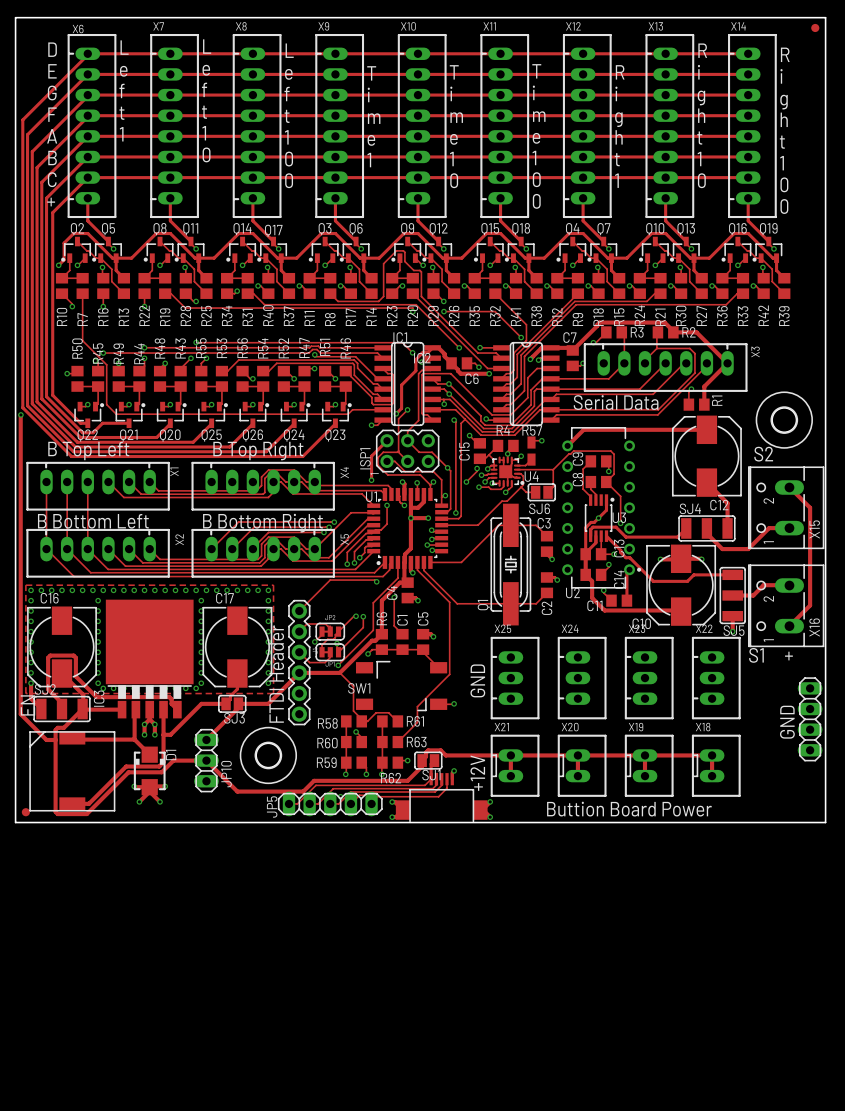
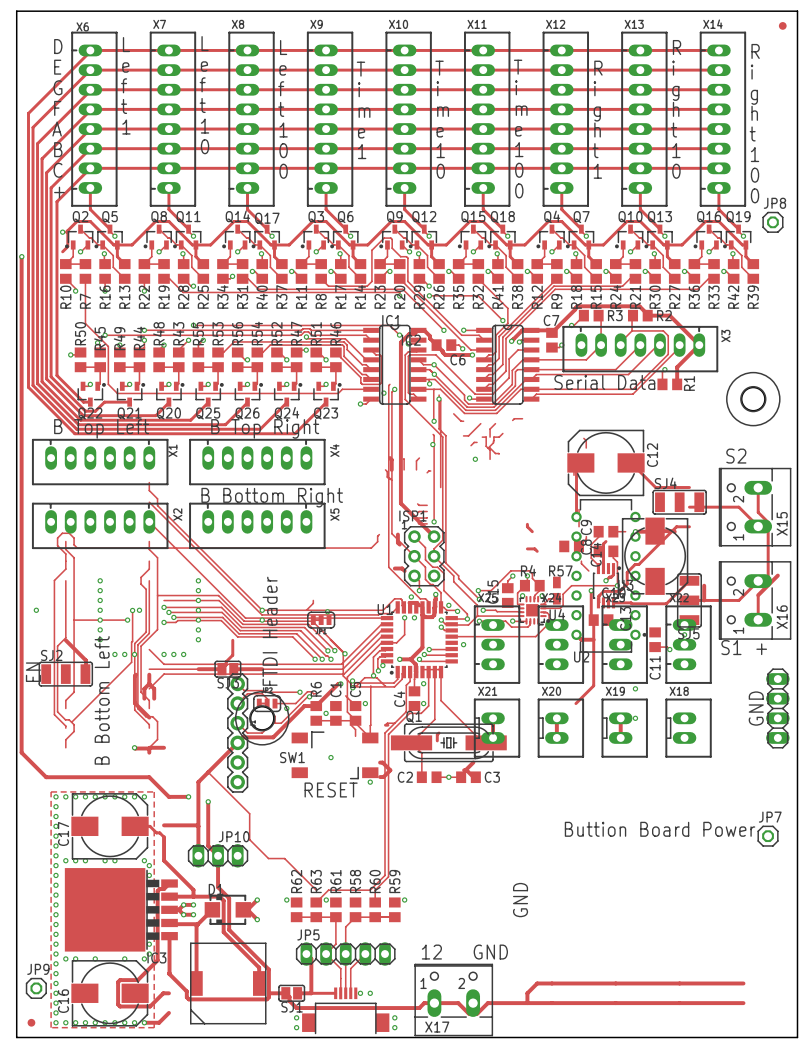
board edge: (15, 17) (15, 822) (825, 822) (825, 17) (15, 17) -> (16, 11) (16, 1037) (797, 1037) (797, 11) (16, 11)
JP8: none -> (772, 222)
via position: (58, 265) -> (62, 232)
track: none -> (21, 256) (21, 752) (46, 777) (149, 777) (168, 796) (188, 796)
via: none -> (21, 256)
track: (428, 351) (421, 354) -> (414, 334) (409, 334) (400, 342) (400, 503) (434, 536)
track: (421, 354) (415, 359) (415, 370) (401, 385) (401, 408) (396, 413) -> none
track: none -> (389, 384) (388, 567) (420, 598) (425, 598) (428, 601) (428, 607)
track: none -> (434, 389) (434, 421)
track: (404, 412) (398, 418) (398, 452) (407, 461) -> (391, 392) (391, 533) (425, 567) (425, 579) (441, 592) (441, 607) (446, 610) (457, 611)
track: (20, 414) (20, 714) (46, 739) (55, 739) -> none
via: (20, 414) -> none
track: none -> (439, 395) (439, 428) (445, 435) (445, 563) (479, 599)
track: (465, 419) (461, 423) (461, 516) (458, 518) (441, 518) -> none
track: (418, 420) (407, 431) (407, 440) (419, 452) (432, 452) (450, 470) (450, 508) (447, 512) (441, 512) -> (405, 399) (442, 437) (442, 540) (434, 548) (434, 556) (453, 575) (453, 581) (477, 605) (477, 616)
track: (706, 429) (583, 429) (567, 445) -> none
via: (469, 435) -> none
track: (387, 440) (371, 456) (371, 480) -> none
via: (541, 440) -> none
via: none -> (434, 421)
R4 position: (505, 445) -> (532, 585)
track: (398, 451) (383, 452) (377, 457) (377, 465) (387, 474) (420, 474) (430, 485) -> none
ISP1 rotation: 0° (407, 451) -> 90° clockwise (424, 556)
ISP1 position: (407, 451) -> (424, 556)
C15 position: (479, 451) -> (507, 595)
R57 position: (531, 451) -> (556, 590)
via: (507, 453) -> none
track: (488, 454) (494, 460) (494, 469) -> none
text position: S2 (763, 454) -> S2 (736, 456)
via: (521, 456) -> none
C12 rotation: 0° (706, 456) -> 90° counterclockwise (605, 462)
C12 position: (706, 456) -> (605, 462)
track: none -> (433, 434) (434, 521)
track: (531, 459) (525, 465) (517, 465) -> none
track: (387, 461) (394, 461) (405, 471) (433, 471) (441, 479) (441, 505) -> none
track: (590, 461) (583, 469) (583, 489) (590, 496) (590, 500) -> none
C9 position: (598, 461) -> (605, 531)
track: (477, 468) (477, 471) (466, 482) -> none
via: (477, 468) -> none
via: (487, 468) -> none
track: (517, 469) (553, 469) -> none
track: (553, 469) (573, 451) (610, 451) (614, 454) (614, 474) (606, 482) (620, 496) (620, 523) -> none
track: (553, 469) (553, 487) (548, 492) -> none
U4 position: (507, 471) -> (534, 610)
via: (608, 471) -> none
track: (494, 473) (481, 475) -> none
track: (517, 473) (523, 476) (523, 485) (507, 501) (502, 501) (478, 525) (441, 525) -> none
via: (481, 475) -> none
track: (494, 477) (489, 477) (485, 481) -> none
via: (371, 480) -> none
via: (485, 481) -> none
track: (46, 482) (46, 549) (70, 573) -> (65, 728) (54, 714) (54, 580) (65, 569) (65, 553) (57, 545) (57, 538) (62, 533) (69, 533) (74, 538) (74, 544)
track: (67, 482) (67, 549) (90, 572) (374, 572) (384, 562) -> none
track: (87, 482) (87, 549) (108, 569) (355, 569) (373, 551) -> none
track: (108, 482) (123, 497) (268, 497) (273, 492) (273, 482) (281, 482) (293, 493) (361, 493) (373, 505) -> none
track: (129, 482) (141, 494) (263, 494) (264, 478) (269, 473) (277, 473) (285, 482) (301, 482) (310, 490) (381, 490) (384, 494) -> none
track: (149, 482) (158, 490) (256, 490) (261, 485) (261, 477) (268, 470) (294, 470) (306, 482) (314, 482) (318, 485) (388, 485) (391, 488) (391, 494) -> none
via: (402, 482) -> none
via: (417, 482) -> none
via: (433, 482) -> none
via: (466, 482) -> none
C8 position: (598, 482) -> (605, 551)
track: (706, 482) (727, 503) (727, 528) -> none
track: (492, 483) (499, 483) -> none
track: (503, 483) (501, 489) (479, 487) -> none
track: (511, 483) (511, 486) (505, 492) -> none
via: (479, 487) -> none
track: (521, 487) (526, 492) (535, 492) -> none
track: none -> (580, 462) (576, 467) (576, 516)
track: none -> (631, 462) (655, 487) (689, 487)
track: (789, 487) (810, 507) (810, 605) -> none
via: (505, 492) -> none
SJ6: (541, 492) -> none
track: (410, 494) (410, 548) (404, 554) (404, 562) (404, 579) (407, 582) (399, 582) (381, 600) (381, 634) (375, 640) (372, 640) (339, 672) (299, 672) (268, 703) -> (387, 630) (381, 630) (342, 669) (262, 669)
track: (423, 494) (423, 501) (418, 507) (410, 507) -> none
via: (445, 495) -> none
track: (606, 500) (606, 510) (585, 527) (585, 574) (592, 581) (592, 597) (604, 610) (681, 611) -> none
track: (387, 505) (387, 524) (381, 529) (366, 533) (347, 552) (347, 564) -> none
via: (387, 505) -> none
via: (404, 505) -> none
track: none -> (149, 482) (149, 490) (157, 498) (157, 505) (262, 610) (383, 610) (394, 598) (400, 598) (403, 607)
U2 position: (601, 507) -> (608, 575)
X15 position: (786, 507) -> (755, 507)
track: (373, 512) (351, 512) (314, 549) (306, 549) (294, 537) (268, 537) (261, 544) (261, 555) (258, 559) (160, 559) -> (387, 618) (245, 618) (159, 531)
via: (455, 512) -> none
track: none -> (758, 487) (758, 512) (768, 522) (768, 585)
track: (373, 518) (367, 518) (328, 557) (310, 557) (301, 549) (285, 549) (277, 540) (269, 540) (264, 545) (264, 557) (259, 562) (142, 562) (129, 549) -> none
track: (410, 518) (428, 518) -> none
via: (410, 518) -> none
via: (428, 518) -> none
via: (598, 518) -> none
U3 position: (599, 518) -> (607, 585)
text rotation: 0° (93, 521) -> 90° counterclockwise (102, 700)
text position: B Bottom Left (93, 521) -> B Bottom Left (102, 700)
track: (331, 522) (238, 522) (211, 549) -> none
via: (334, 522) -> none
via: (620, 523) -> none
track: (373, 525) (367, 525) (332, 561) (293, 561) (281, 549) (273, 549) (268, 554) (268, 559) (261, 566) (125, 566) (108, 549) -> none
track: (326, 527) (254, 527) (232, 549) -> none
via: (329, 527) -> none
track: none -> (149, 502) (262, 614) (378, 614) (391, 613) (397, 607)
U1 position: (407, 528) -> (419, 639)
track: (686, 528) (677, 537) (625, 537) (616, 527) (592, 527) (590, 529) (590, 536) -> none
track: (789, 528) (769, 528) (748, 549) (722, 549) (706, 533) (706, 528) -> none
via: (431, 530) -> none
track: (323, 532) (268, 532) (252, 549) -> none
via: (323, 532) -> none
track: none -> (689, 507) (738, 507) (758, 526)
track: (546, 536) (536, 525) (498, 525) (461, 562) (430, 562) -> none
track: (595, 536) (595, 542) (585, 553) -> none
track: (606, 536) (625, 557) (629, 557) (653, 581) (687, 581) (693, 574) (732, 574) -> none
track: (373, 538) (366, 539) (354, 551) (354, 562) -> none
via: (431, 539) -> none
C3 rotation: 0° (546, 543) -> 90° clockwise (468, 777)
C3 position: (546, 543) -> (468, 777)
track: (373, 544) (366, 546) (364, 552) (359, 557) -> none
via: (427, 545) -> none
via: none -> (434, 521)
via: (432, 550) -> none
C13 position: (593, 554) -> (601, 620)
track: (601, 554) (614, 554) -> (613, 531) (625, 531)
via: (614, 554) -> none
track: none -> (689, 526) (676, 526) (638, 564) (635, 564) (627, 572) (627, 583) (619, 591) (603, 591) (598, 596) (598, 602)
via: (359, 557) -> none
via: (552, 559) -> none
track: none -> (598, 531) (598, 537) (591, 544) (591, 558) (598, 565) (598, 568)
via: (701, 559) -> none
via: (354, 562) -> none
track: (397, 562) (397, 578) (373, 602) (373, 630) (338, 665) -> none
track: (417, 562) (417, 570) (449, 602) (449, 674) (417, 706) (417, 722) (397, 742) -> none
track: (423, 562) (423, 570) (457, 603) (536, 603) (546, 592) -> none
via: (347, 564) -> none
track: none -> (414, 536) (425, 547) (425, 559) (432, 567) (437, 567) (443, 573) (443, 590) (467, 614) (467, 619) (451, 618)
Q1 rotation: 0° (510, 564) -> 90° clockwise (448, 742)
Q1 position: (510, 564) -> (448, 742)
via: (608, 564) -> none
track: none -> (65, 541) (65, 549) (74, 557) (74, 692) (65, 700) (65, 708)
track: none -> (149, 541) (149, 549) (157, 557) (157, 629) (141, 646) (141, 692) (149, 700) (149, 708)
via: (412, 572) -> none
via: (557, 580) -> none
track: none -> (613, 551) (613, 557) (617, 562) (617, 585) (571, 585) (563, 594) (563, 605) (560, 608) (543, 608)
track: (376, 581) (374, 580) (330, 580) (299, 610) -> none
via: (376, 581) -> none
zone outline: (25, 585) (273, 585) (273, 693) (25, 693) (25, 585) -> none
C2 rotation: 0° (546, 585) -> 90° clockwise (429, 777)
C2 position: (546, 585) -> (429, 777)
track: (789, 585) (763, 585) (753, 595) (732, 595) -> none
via: (31, 590) -> none
via: (41, 590) -> none
via: (51, 590) -> none
via: (62, 590) -> none
via: (72, 590) -> none
via: (82, 590) -> none
via: (92, 590) -> none
via: (103, 590) -> none
via: (113, 590) -> none
via: (123, 590) -> none
via: (134, 590) -> none
via: (144, 590) -> none
track: none -> (149, 561) (149, 569) (141, 577)
via: (154, 590) -> none
via: (165, 590) -> none
via: (175, 590) -> none
via: (185, 590) -> none
via: (196, 590) -> none
via: (206, 590) -> none
via: (216, 590) -> none
via: (227, 590) -> none
via: (237, 590) -> none
via: (247, 590) -> none
via: (258, 590) -> none
via: (268, 590) -> none
C4 position: (407, 590) -> (414, 698)
via: (603, 590) -> none
SJ5 position: (732, 595) -> (689, 600)
track: (394, 597) (394, 625) (402, 634) -> none
via: (394, 597) -> none
track: none -> (613, 568) (613, 574) (605, 580)
via: (31, 600) -> none
via: (98, 600) -> none
via: (201, 600) -> none
via: (268, 600) -> none
via: (418, 600) -> none
C11 rotation: 0° (619, 600) -> 90° clockwise (655, 639)
C11 position: (619, 600) -> (655, 639)
track: none -> (414, 575) (419, 580) (419, 590)
track: none -> (527, 575) (527, 583) (517, 593) (517, 604)
via: none -> (527, 575)
C11 name position: C11 (594, 605) -> C11 (655, 667)
X16 position: (786, 605) -> (755, 600)
track: none -> (512, 576) (507, 581) (507, 588)
via: none -> (512, 576)
track: none -> (141, 577) (141, 584) (146, 589) (146, 632) (134, 643) (134, 710) (149, 724) (149, 728)
via: (31, 610) -> none
track: none -> (65, 580) (65, 637) (57, 646) (57, 711) (74, 724) (74, 731) (65, 739) (65, 747)
track: none -> (149, 580) (149, 633) (137, 644) (137, 708) (145, 716) (152, 716) (157, 721) (157, 739) (149, 747)
via: (268, 610) -> none
via: none -> (605, 580)
track: none -> (689, 580) (666, 603) (613, 602)
track: none -> (758, 581) (738, 600) (689, 600)
track: (356, 616) (335, 634) (333, 639) (327, 639) (322, 645) (322, 652) -> none
via: (356, 616) -> none
track: (363, 616) (363, 627) (338, 652) (337, 643) -> none
via: (363, 616) -> none
via: none -> (617, 585)
via: (31, 621) -> none
via: (268, 621) -> none
via: none -> (419, 590)
track: none -> (478, 590) (491, 590) (510, 570) (529, 570) (532, 573) (532, 578) (539, 585) (539, 590) (534, 595) (534, 599)
via: none -> (478, 590)
track: none -> (591, 590) (591, 617) (593, 620) (593, 685) (575, 703)
via: none -> (591, 590)
track: none -> (435, 594) (434, 615) (432, 617) (422, 615)
via: none -> (435, 594)
track: none -> (157, 595) (218, 595) (244, 621) (312, 621) (345, 653)
via: none -> (522, 595)
via: none -> (542, 595)
track: none -> (758, 595) (758, 619)
via: none -> (411, 596)
track: none -> (556, 598) (549, 598) (543, 604)
via: none -> (479, 599)
via: (31, 631) -> none
track: none -> (164, 600) (219, 600) (242, 624) (308, 624) (334, 650)
via: (268, 631) -> none
track: (299, 631) (306, 624) (325, 624) (330, 626) (330, 631) -> none
part position: (330, 631) -> (267, 703)
via: (732, 631) -> none
via: (433, 636) -> none
via: none -> (448, 605)
track: none -> (164, 607) (221, 607) (241, 627) (304, 627) (327, 650)
via: none -> (164, 607)
track: none -> (422, 607) (422, 647) (410, 659)
via: none -> (139, 610)
via: (314, 641) -> none
R6 position: (381, 641) -> (316, 713)
C1 position: (402, 641) -> (335, 713)
C5 position: (423, 641) -> (355, 713)
track: none -> (483, 610) (521, 612)
via: none -> (483, 610)
track: none -> (132, 610) (131, 662) (71, 722)
via: none -> (132, 610)
via: none -> (457, 611)
track: none -> (543, 612) (549, 614) (549, 623) (535, 636) (451, 636)
track: none -> (168, 612) (222, 612) (240, 630) (300, 630) (330, 659)
via: none -> (168, 612)
C16 rotation: 0° (62, 647) -> 90° counterclockwise (110, 993)
C16 position: (62, 647) -> (110, 993)
C17 rotation: 0° (237, 647) -> 90° counterclockwise (110, 826)
C17 position: (237, 647) -> (110, 826)
track: none -> (477, 616) (468, 625) (445, 624) (441, 620)
track: none -> (477, 616) (521, 616)
track: none -> (173, 617) (222, 617) (238, 633) (296, 633) (322, 659)
via: none -> (173, 617)
track: none -> (404, 617) (404, 634) (396, 642) (381, 642) (347, 677) (347, 712) (370, 737)
via: none -> (404, 617)
via: none -> (414, 617)
via: none -> (467, 619)
via: (31, 652) -> none
track: none -> (74, 620) (127, 620)
via: none -> (127, 620)
track: (299, 652) (309, 662) (325, 662) (330, 657) (330, 652) -> (237, 723) (247, 733) (262, 733) (267, 728) (267, 723)
via: none -> (441, 620)
track: (368, 653) (372, 649) (423, 649) (423, 652) (438, 667) -> none
via: (368, 653) -> none
track: none -> (479, 621) (505, 621) (511, 627) (527, 627) (530, 621)
via: none -> (479, 621)
track: none -> (512, 621) (526, 621)
via: none -> (512, 621)
track: none -> (164, 622) (221, 620) (237, 636) (292, 636) (315, 659)
via: none -> (164, 622)
text position: S1 (756, 655) -> S1 (731, 647)
track: none -> (387, 624) (381, 624) (341, 664) (164, 664) (149, 649)
text position: + (788, 656) -> + (761, 649)
IC3 rotation: 0° (149, 659) -> 90° counterclockwise (121, 909)
IC3 position: (149, 659) -> (121, 909)
track: none -> (441, 627) (444, 630) (451, 630)
via: none -> (441, 627)
SW1 footprint: [355, 661, 448, 711] -> [291, 731, 379, 780]
via: (31, 662) -> none
via: (268, 662) -> none
part position: (299, 662) -> (237, 733)
via: (338, 665) -> none
track: none -> (576, 634) (581, 639) (593, 639)
via: none -> (684, 634)
track: none -> (387, 636) (381, 636) (344, 674) (164, 674) (149, 688)
via: (31, 672) -> none
via: (268, 672) -> none
via: none -> (463, 644)
text: GND (477, 680) -> none
track: none -> (655, 647) (667, 647) (669, 649)
track: none -> (387, 649) (379, 650) (373, 657) (373, 675)
track: none -> (451, 649) (429, 649)
track: (31, 683) (31, 698) (41, 709) -> none
via: (31, 683) -> none
via: (98, 683) -> none
via: (201, 683) -> none
via: (268, 683) -> none
via: none -> (429, 649)
via: none -> (669, 649)
via: none -> (327, 650)
via: none -> (334, 650)
via: none -> (345, 653)
via: (103, 688) -> none
via: (196, 688) -> none
track: none -> (424, 654) (451, 655)
via: none -> (424, 654)
track: none -> (387, 655) (377, 658) (378, 670)
via: none -> (315, 659)
via: none -> (322, 659)
via: none -> (330, 659)
track: none -> (399, 659) (410, 659)
via: none -> (399, 659)
track: none -> (410, 659) (415, 664) (414, 679)
track: none -> (419, 659) (421, 661) (451, 661)
via: none -> (419, 659)
via: none -> (382, 665)
track: (201, 703) (170, 734) (163, 734) -> (198, 669) (149, 669)
track: (238, 703) (238, 707) (206, 739) -> none
via: (454, 703) -> none
via: none -> (378, 670)
track: none -> (397, 672) (397, 679) (393, 683) (355, 683) (352, 680)
track: none -> (403, 672) (402, 679) (394, 686) (352, 687)
track: none -> (410, 672) (410, 681) (406, 685) (406, 711) (385, 733) (385, 875) (370, 890) (328, 890) (316, 902)
track: none -> (428, 672) (428, 705) (421, 713) (409, 713) (388, 734) (388, 876) (375, 890) (375, 902)
track: none -> (434, 672) (434, 719) (411, 742) (421, 753) (421, 777)
track: none -> (441, 672) (441, 700) (484, 744)
track: (62, 709) (62, 703) (48, 689) (48, 657) (50, 655) (73, 655) (75, 657) (75, 676) (96, 697) (169, 697) (171, 703) (177, 709) -> none
track: (82, 709) (122, 709) -> none
track: (82, 709) (63, 727) (57, 727) (55, 729) (55, 811) (57, 814) (86, 814) (128, 772) (161, 772) (173, 760) (206, 760) (237, 791) (303, 791) (314, 780) (407, 780) (422, 766) (422, 760) (428, 750) (440, 750) (445, 755) (712, 755) (712, 776) -> none
track: (163, 709) (163, 762) (159, 766) (126, 766) (88, 803) (72, 803) -> none
via: none -> (373, 675)
track: none -> (414, 679) (414, 691)
via: none -> (352, 680)
track: none -> (237, 683) (244, 690) (299, 692)
track: none -> (340, 683) (338, 683) (316, 706) (304, 706) (273, 737) (243, 737) (198, 782) (198, 855)
via: none -> (340, 683)
via: none -> (423, 683)
part position: (810, 719) -> (777, 708)
track: (346, 721) (345, 774) -> none
R58 rotation: 0° (354, 721) -> 90° clockwise (355, 909)
R58 position: (354, 721) -> (355, 909)
R61 rotation: 0° (390, 721) -> 90° clockwise (335, 909)
R61 position: (390, 721) -> (335, 909)
R61 name position: R61 (415, 721) -> R61 (335, 881)
text position: GND (787, 722) -> GND (756, 708)
via: none -> (352, 687)
via: (144, 724) -> none
via: (154, 724) -> none
via: none -> (635, 688)
via: none -> (299, 692)
track: none -> (316, 693) (307, 691) (295, 703) (275, 703)
via: (356, 731) -> none
track: none -> (309, 696) (281, 723) (275, 723) (275, 716) (272, 713) (262, 713) (259, 710) (259, 703)
via: none -> (309, 696)
via: (144, 734) -> none
via: (154, 734) -> none
track: (72, 738) (73, 739) (134, 739) -> none
track: none -> (237, 703) (247, 693) (262, 693) (267, 698) (267, 703)
via: none -> (365, 703)
via: none -> (423, 703)
R60 rotation: 0° (354, 742) -> 90° clockwise (375, 909)
R60 position: (354, 742) -> (375, 909)
R63 rotation: 0° (390, 742) -> 90° clockwise (316, 909)
R63 position: (390, 742) -> (316, 909)
R63 name position: R63 (416, 742) -> R63 (316, 881)
via: none -> (286, 708)
via: none -> (326, 713)
via: none -> (635, 718)
track: none -> (316, 720) (355, 720)
JP10 rotation: 0° (206, 760) -> 90° clockwise (218, 855)
JP10 position: (206, 760) -> (218, 855)
via: (407, 760) -> none
SJ1 position: (428, 760) -> (291, 993)
track: (434, 760) (431, 763) (431, 779) (424, 785) (315, 785) (297, 803) (289, 803) -> none
R59 rotation: 0° (354, 762) -> 90° clockwise (394, 909)
R59 position: (354, 762) -> (394, 909)
R62 rotation: 0° (390, 762) -> 90° clockwise (296, 909)
R62 position: (390, 762) -> (296, 909)
D1 rotation: 0° (149, 770) -> 90° counterclockwise (227, 909)
D1 position: (149, 770) -> (227, 909)
via: (454, 770) -> none
part: (72, 771) -> none
text: +12V (477, 773) -> none
JP10 name position: JP10 (226, 774) -> JP10 (234, 836)
via: (345, 774) -> none
via: (366, 774) -> none
via: (381, 774) -> none
R62 name position: R62 (391, 778) -> R62 (296, 881)
track: (436, 779) (436, 785) (432, 788) (333, 788) (318, 803) (309, 803) -> none
track: (441, 779) (441, 785) (435, 791) (350, 791) (343, 799) -> none
track: (447, 779) (447, 788) (438, 796) (359, 795) (350, 803) -> none
via: (165, 786) -> none
part: (441, 797) -> none
track: (343, 799) (338, 803) (330, 803) -> none
track: (139, 801) (149, 791) (160, 801) -> none
via: (139, 801) -> none
via: (160, 801) -> none
via: (392, 801) -> none
via: (490, 801) -> none
JP5 position: (330, 803) -> (345, 954)
JP5 name rotation: 0° (272, 806) -> 90° clockwise (308, 934)
text position: Buttion Board Power (629, 809) -> Buttion Board Power (660, 829)
part: (25, 812) -> none
track: none -> (208, 772) (249, 813) (249, 839) (268, 858) (284, 858) (316, 890)
via: (392, 817) -> none
track: none -> (436, 777) (461, 777)
via: none -> (448, 777)
via: (490, 817) -> none
via: none -> (370, 782)
text: none -> RESET (331, 790)
zone outline: none -> (51, 791) (51, 1027) (154, 1027) (154, 791) (51, 791)
via: none -> (55, 796)
via: none -> (65, 796)
via: none -> (75, 796)
via: none -> (85, 796)
via: none -> (95, 796)
via: none -> (105, 796)
via: none -> (114, 796)
via: none -> (124, 796)
via: none -> (134, 796)
via: none -> (144, 796)
via: none -> (188, 796)
track: none -> (208, 801) (208, 845) (218, 855) (218, 887) (229, 898) (229, 929) (268, 969) (268, 997) (266, 999) (188, 999) (186, 991) (169, 973)
via: none -> (208, 801)
via: none -> (55, 806)
via: none -> (55, 816)
track: none -> (164, 825) (198, 826)
via: none -> (55, 826)
track: none -> (135, 826) (150, 826) (164, 837) (164, 860) (193, 889) (193, 896)
via: none -> (55, 836)
JP7: none -> (768, 836)
via: none -> (55, 845)
via: none -> (55, 855)
via: none -> (65, 860)
via: none -> (75, 860)
via: none -> (85, 860)
via: none -> (105, 860)
via: none -> (114, 860)
via: none -> (144, 860)
via: none -> (55, 865)
via: none -> (149, 865)
via: none -> (55, 875)
via: none -> (149, 875)
track: none -> (169, 883) (164, 889) (157, 891) (157, 960) (137, 980) (120, 980) (118, 982) (118, 1004) (120, 1006) (150, 1006) (163, 993) (168, 993)
via: none -> (55, 885)
via: none -> (55, 895)
track: none -> (169, 896) (219, 896) (223, 900) (223, 932) (259, 967) (259, 983)
track: none -> (257, 900) (247, 909)
via: none -> (257, 900)
via: none -> (286, 900)
via: none -> (326, 900)
via: none -> (404, 900)
text: none -> GND (520, 900)
via: none -> (55, 904)
via: none -> (183, 904)
track: none -> (193, 904) (183, 904) (178, 909)
via: none -> (193, 904)
track: none -> (178, 909) (183, 914) (193, 914)
track: none -> (212, 909) (196, 925) (196, 983)
track: none -> (247, 909) (257, 919)
via: none -> (55, 914)
via: none -> (183, 914)
via: none -> (193, 914)
track: none -> (296, 917) (335, 917) (335, 944) (326, 954) (340, 968) (340, 993)
track: none -> (394, 917) (355, 917) (345, 926) (345, 993)
via: none -> (257, 919)
track: none -> (169, 922) (198, 924)
via: none -> (55, 924)
via: none -> (55, 934)
track: none -> (169, 936) (168, 973)
via: none -> (55, 944)
via: none -> (149, 944)
text: none -> 12 GND (464, 952)
via: none -> (55, 954)
via: none -> (149, 954)
track: none -> (306, 954) (311, 958) (311, 993)
track: none -> (365, 954) (350, 968) (350, 993)
via: none -> (65, 958)
via: none -> (75, 958)
via: none -> (95, 958)
via: none -> (124, 958)
via: none -> (144, 958)
via: none -> (55, 963)
via: none -> (55, 973)
via: none -> (55, 983)
part: none -> (228, 983)
track: none -> (743, 983) (537, 983) (527, 993) (527, 1003)
JP9: none -> (36, 988)
via: none -> (55, 993)
track: none -> (268, 993) (285, 993) (289, 997) (289, 1000) (296, 1008) (419, 1008) (424, 1003) (458, 1003) (468, 1013) (477, 1013) (487, 1003) (743, 1003)
track: none -> (297, 993) (311, 993)
track: none -> (311, 993) (335, 993)
via: none -> (360, 993)
via: none -> (370, 993)
X17: none -> (453, 999)
via: none -> (55, 1003)
part: none -> (345, 1010)
via: none -> (55, 1012)
track: none -> (168, 1012) (159, 1022) (144, 1022)
via: none -> (296, 1017)
via: none -> (394, 1017)
part: none -> (31, 1022)
via: none -> (55, 1022)
via: none -> (65, 1022)
via: none -> (75, 1022)
via: none -> (85, 1022)
via: none -> (95, 1022)
via: none -> (105, 1022)
via: none -> (114, 1022)
via: none -> (124, 1022)
via: none -> (134, 1022)
via: none -> (144, 1022)
via: none -> (296, 1027)
via: none -> (394, 1027)

